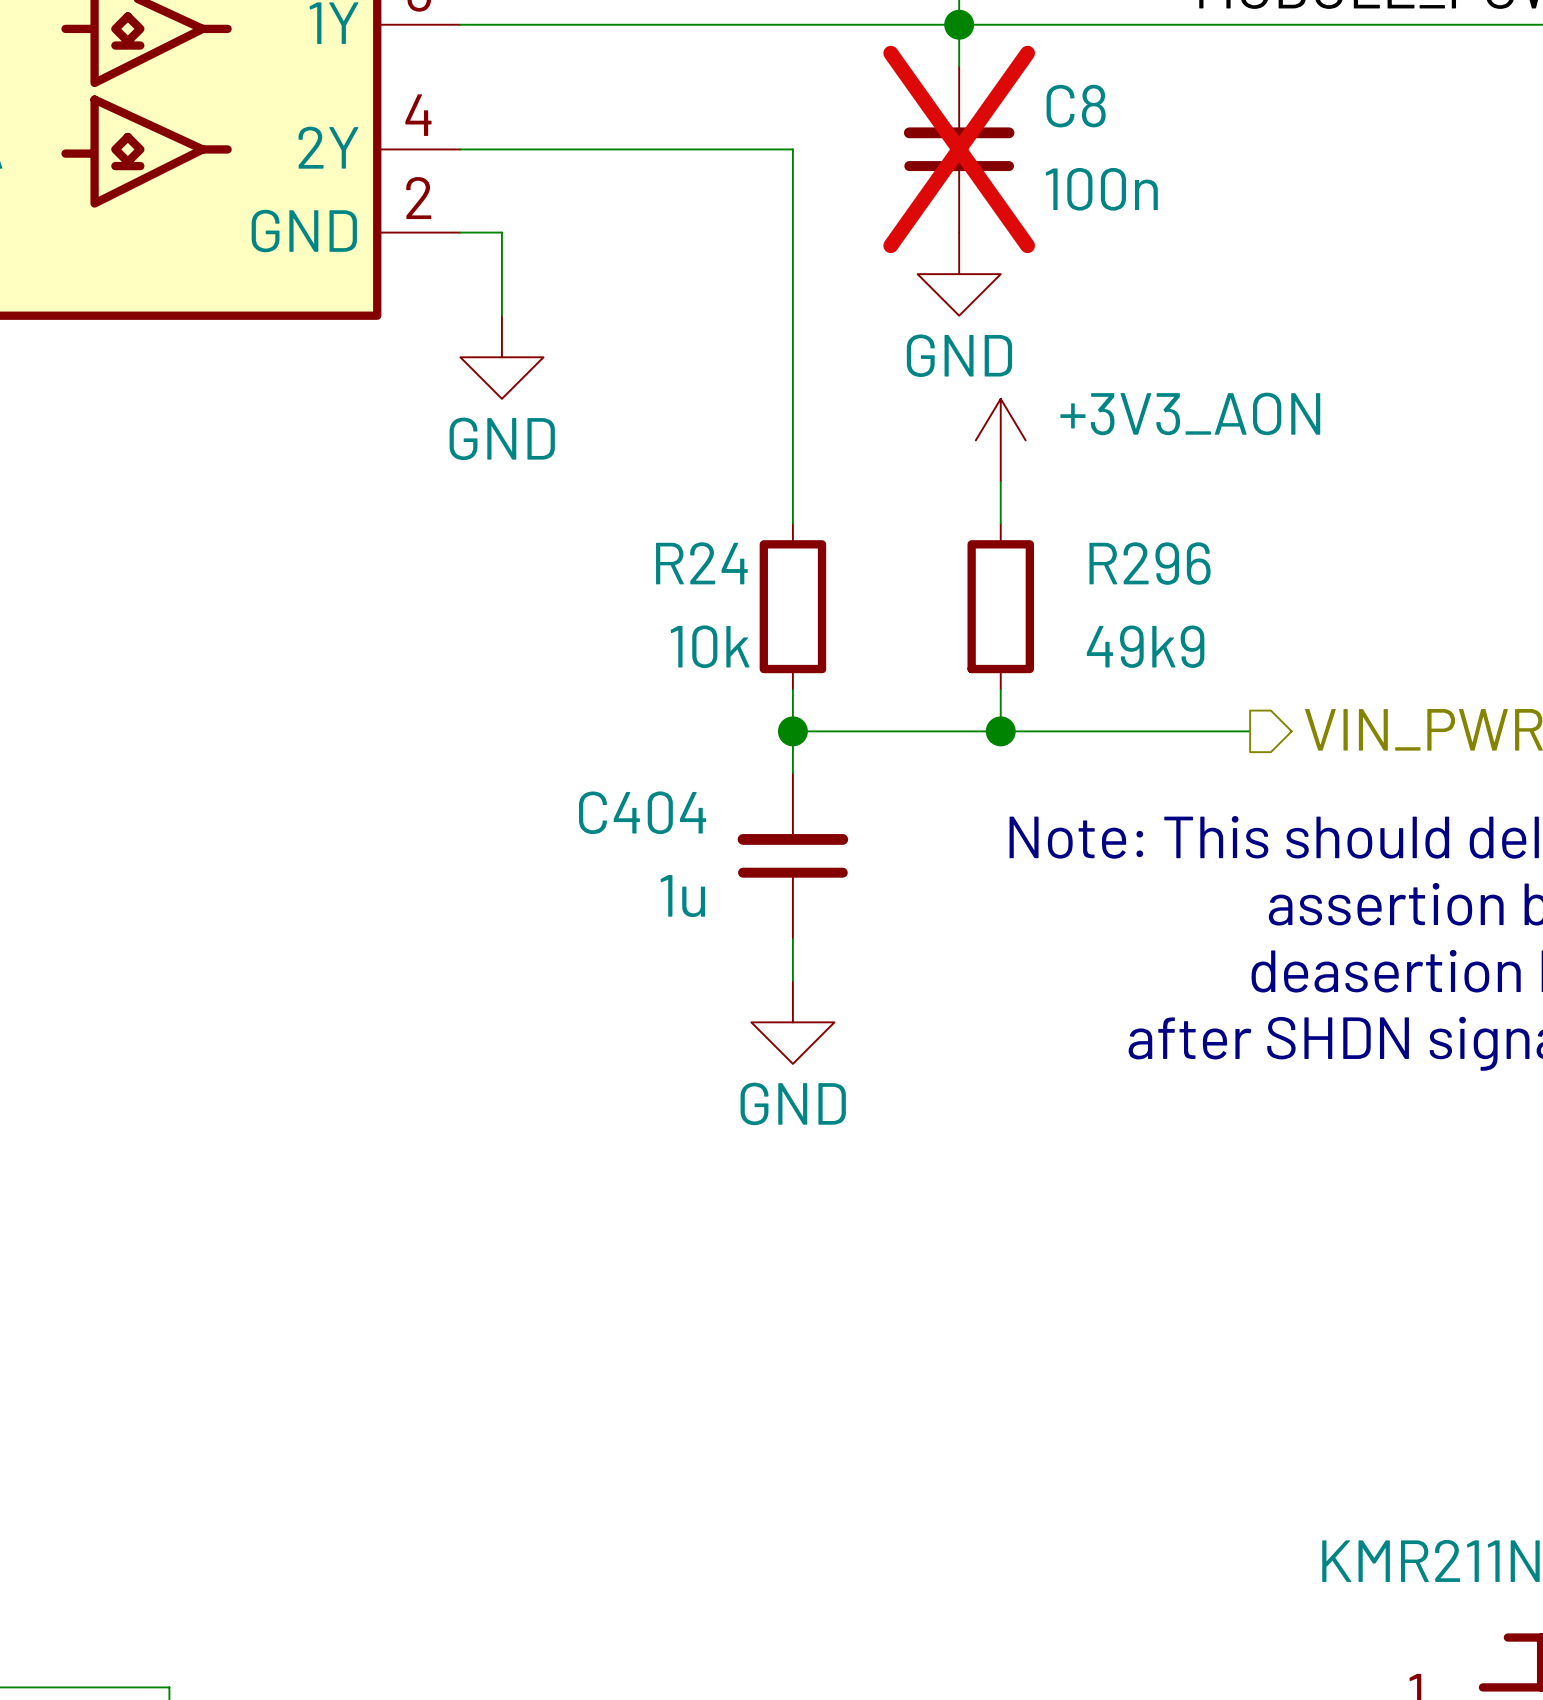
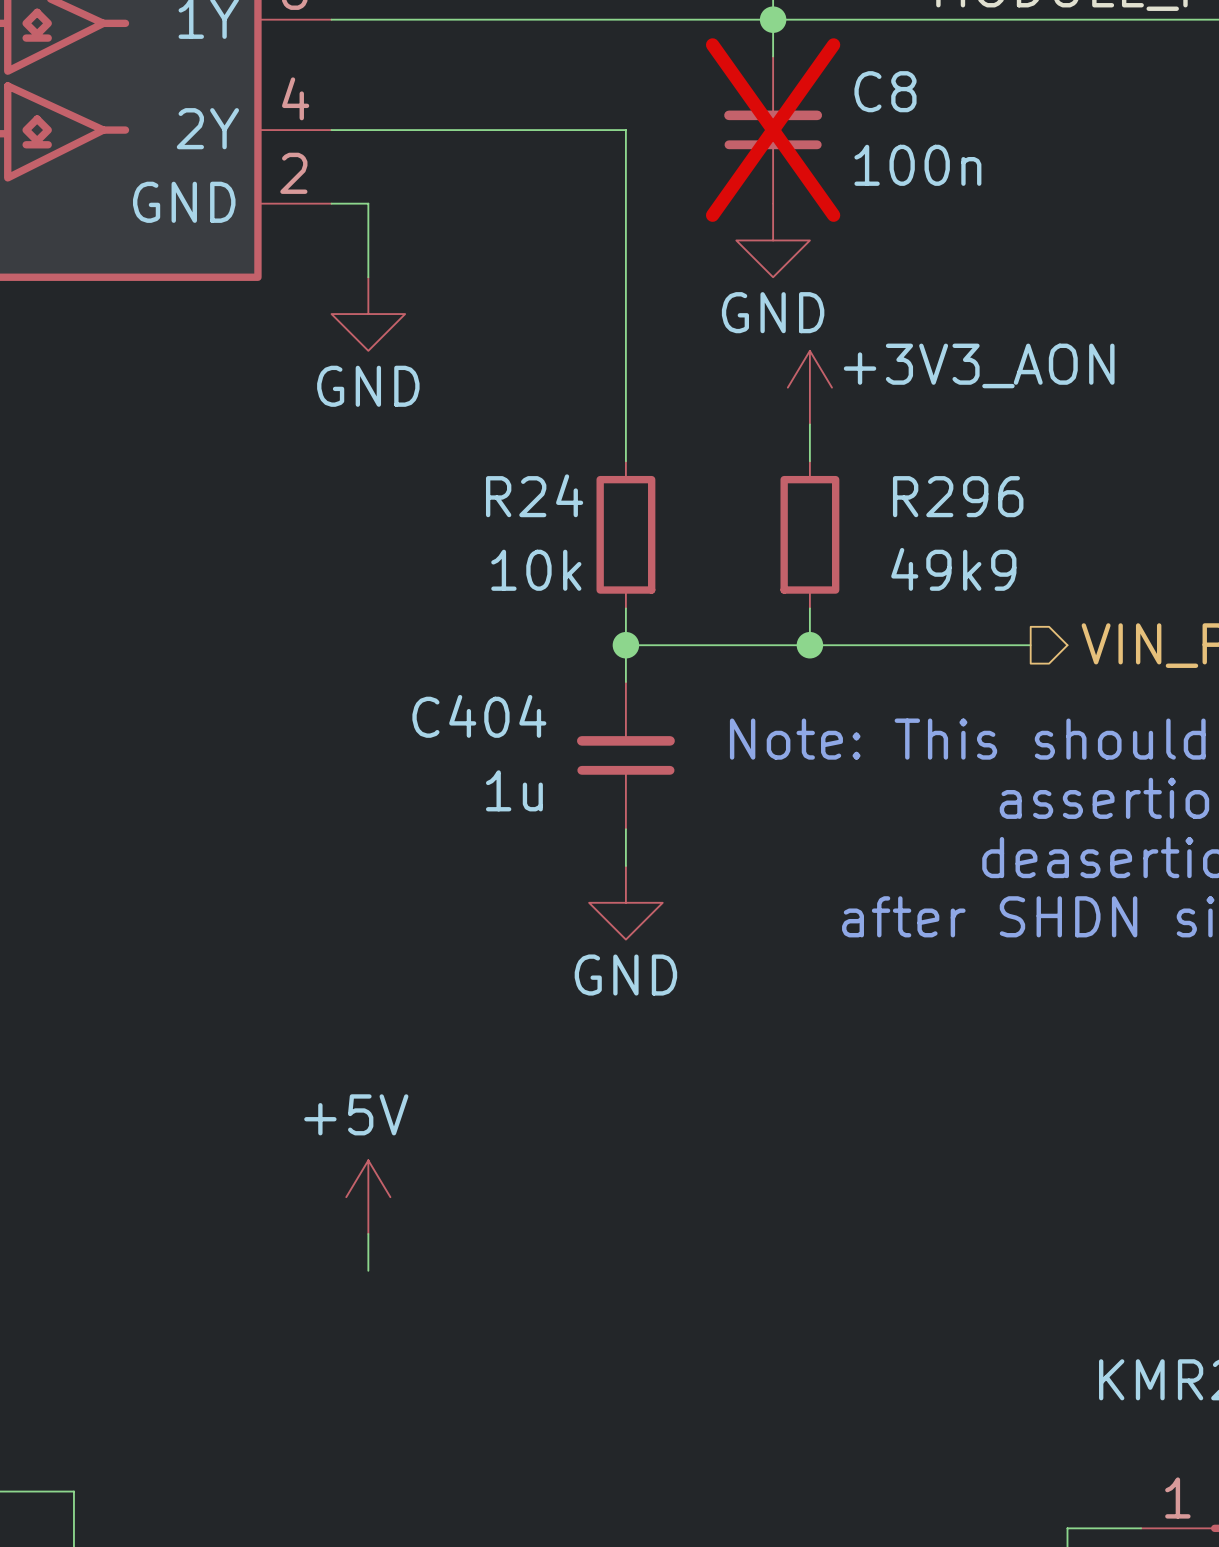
power symbol: none -> +5V (368, 1197)
wire: none -> (368, 1233) (368, 1270)

